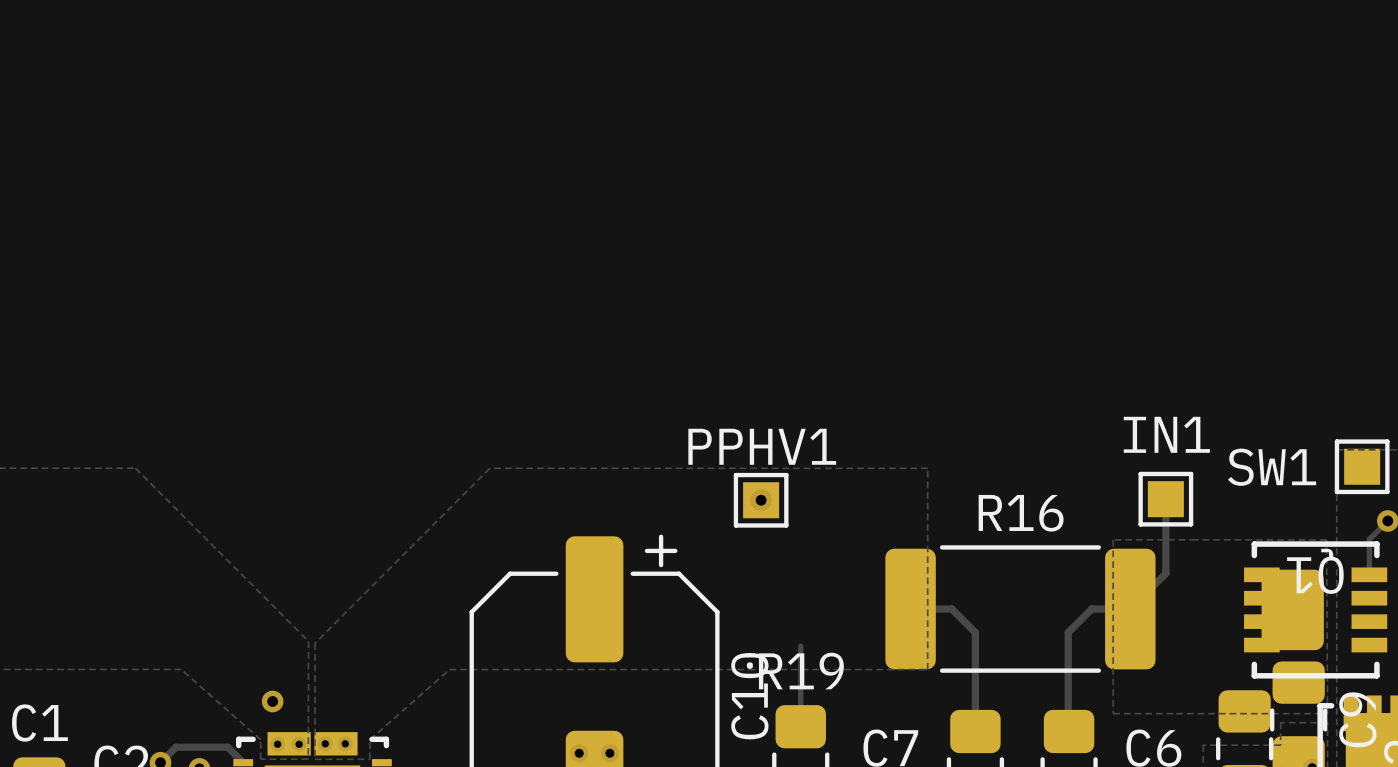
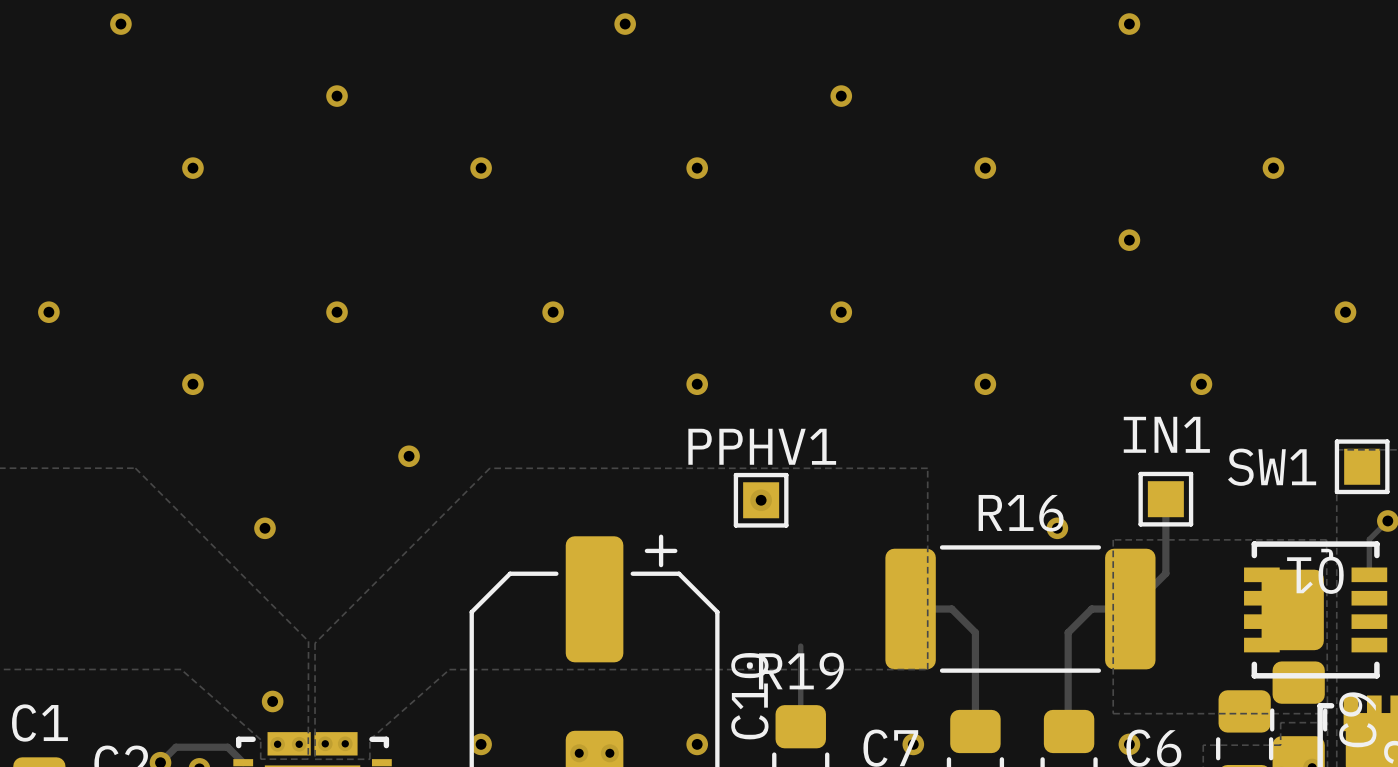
via: none -> (120, 24)
via: none -> (625, 24)
via: none -> (1129, 24)
via: none -> (337, 96)
via: none -> (841, 96)
via: none -> (192, 168)
via: none -> (481, 168)
via: none -> (697, 168)
via: none -> (985, 168)
via: none -> (1273, 168)
via: none -> (1129, 240)
via: none -> (48, 312)
via: none -> (337, 312)
via: none -> (553, 312)
via: none -> (841, 312)
via: none -> (1345, 312)
via: none -> (192, 384)
via: none -> (697, 384)
via: none -> (985, 384)
via: none -> (1201, 384)
via: none -> (409, 456)
via: none -> (264, 528)
via: none -> (1057, 528)
via: none -> (481, 744)
via: none -> (697, 744)
via: none -> (913, 744)
via: none -> (1129, 744)

